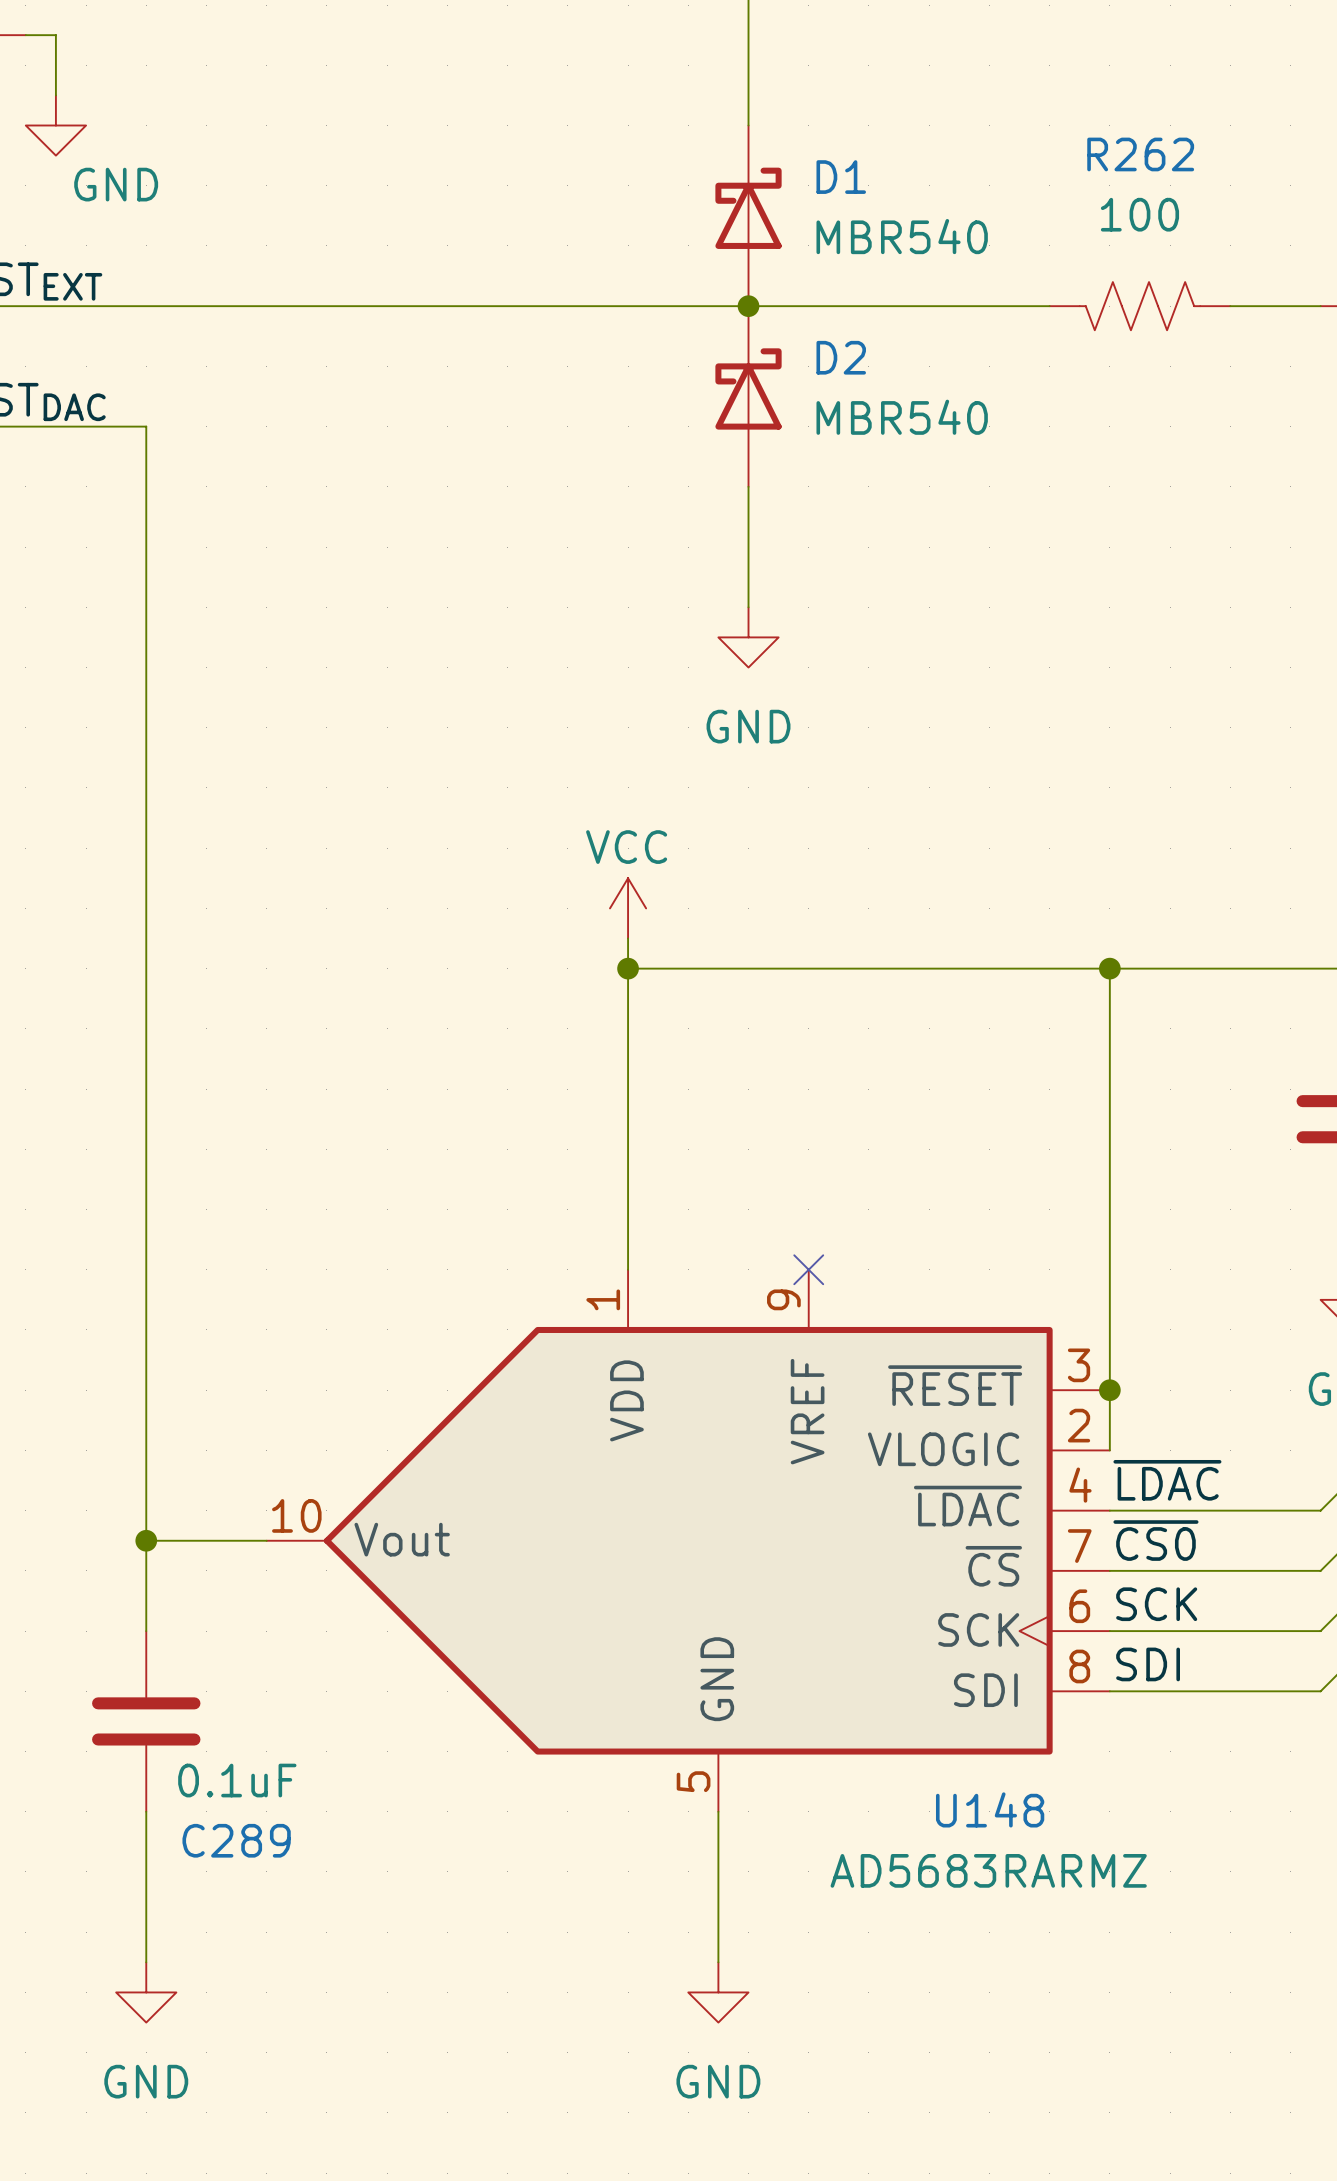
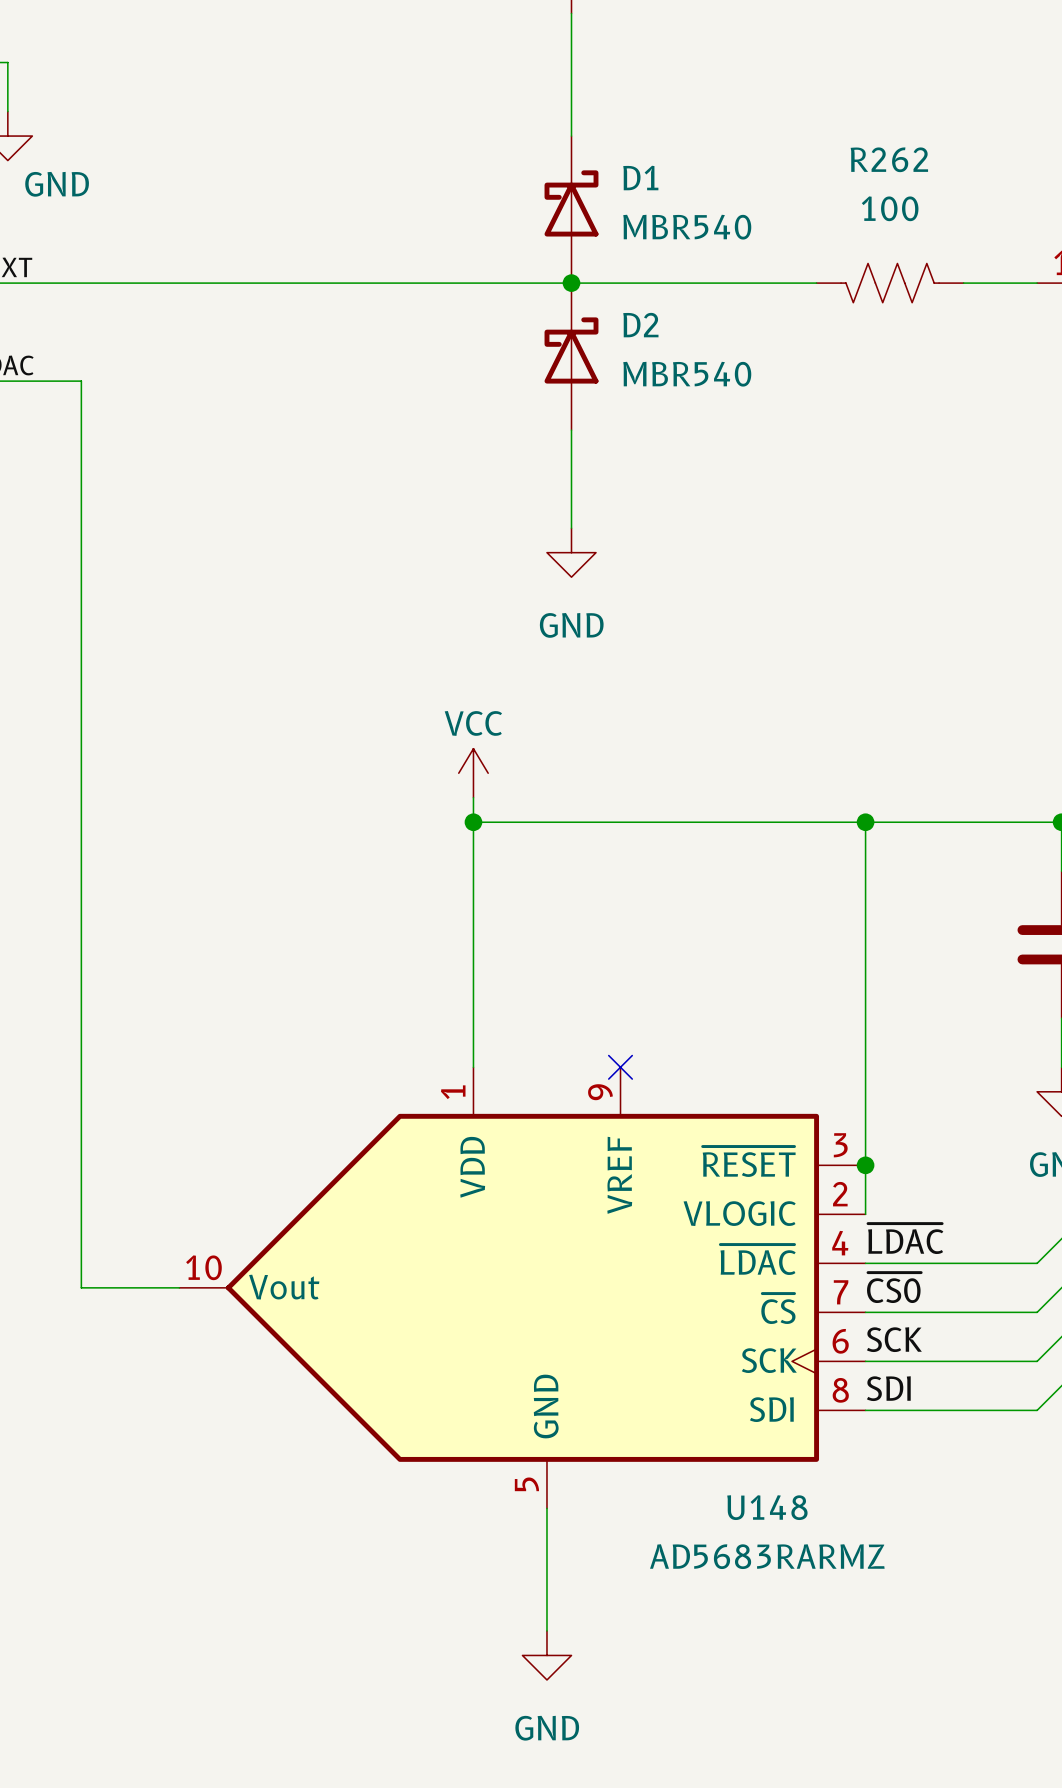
wire: (146, 1540) (146, 1631) -> none
junction: (146, 1540) -> none
C289: 0.1uF (146, 1721) -> none
wire: (146, 1811) (146, 1962) -> none
power symbol: GND (146, 1992) -> none

